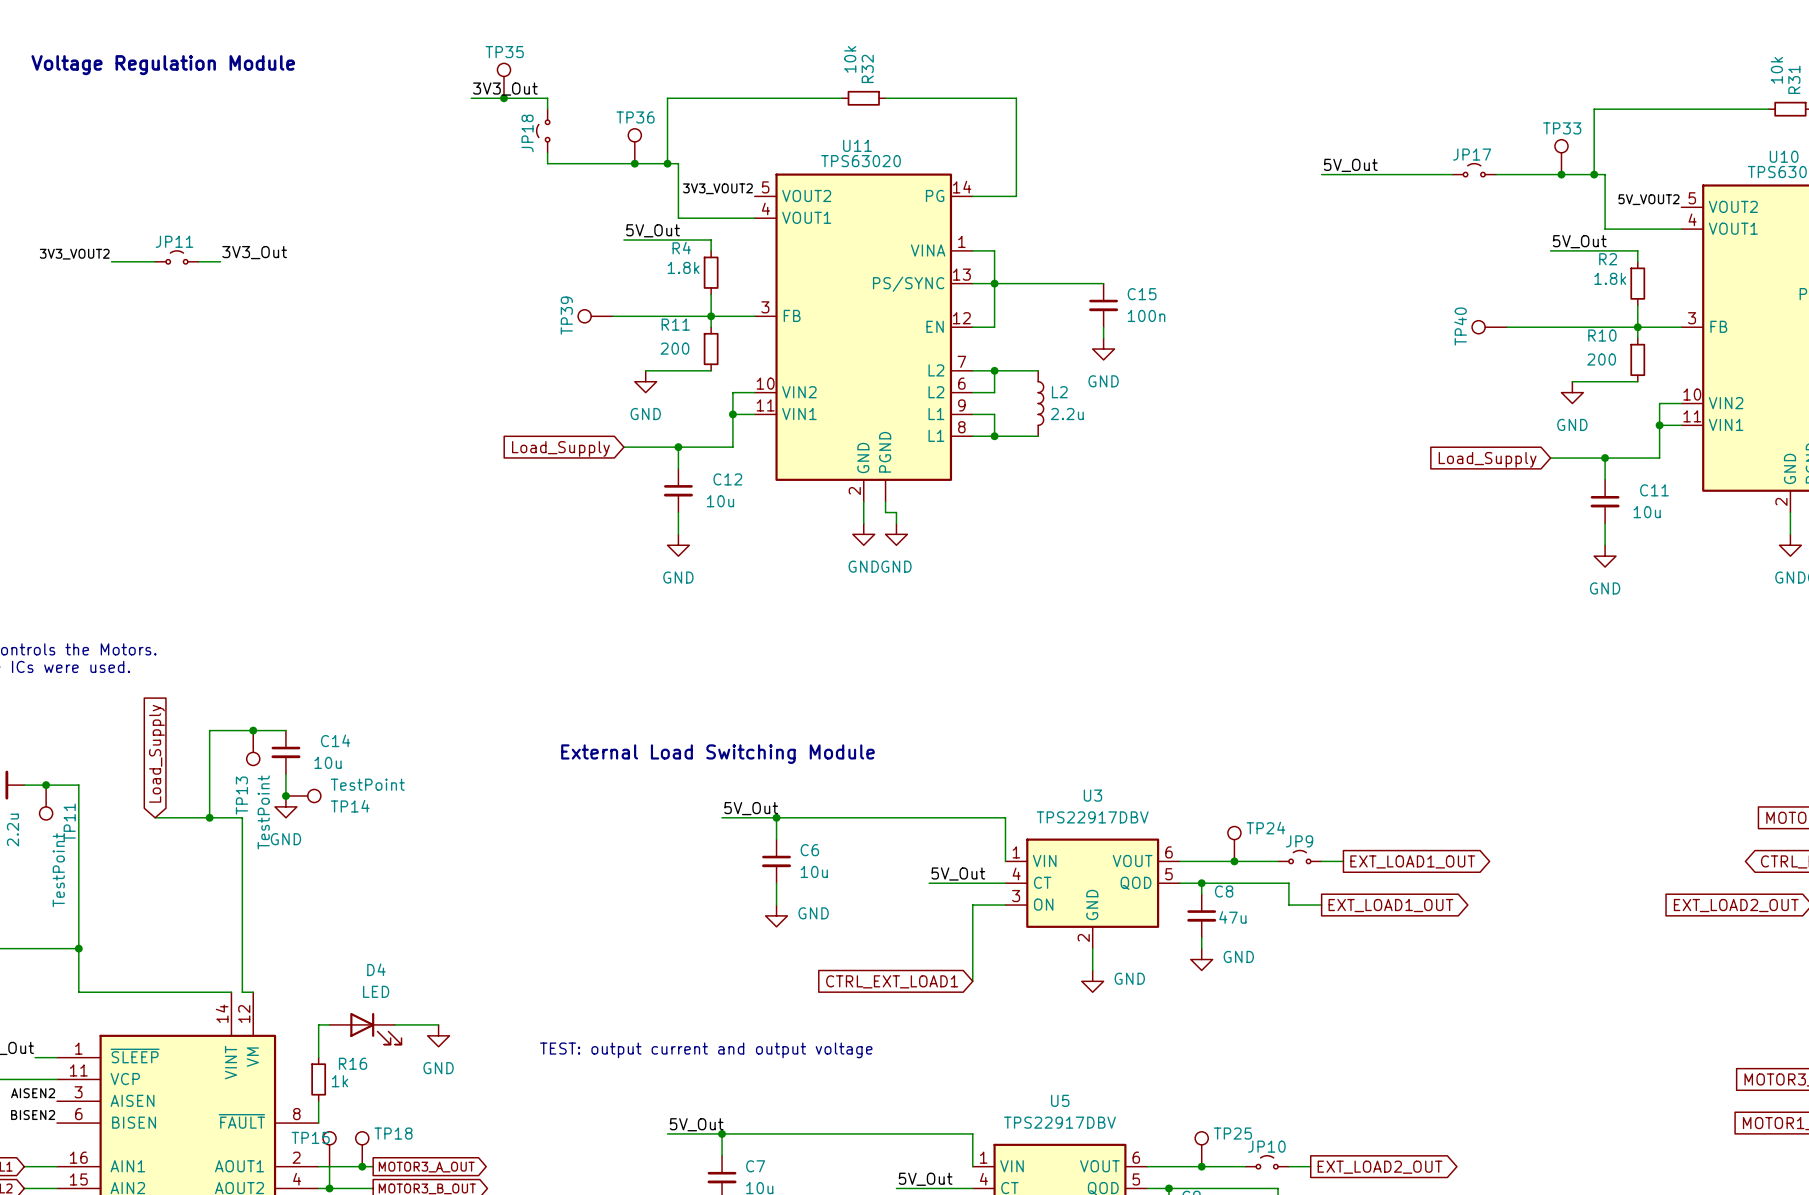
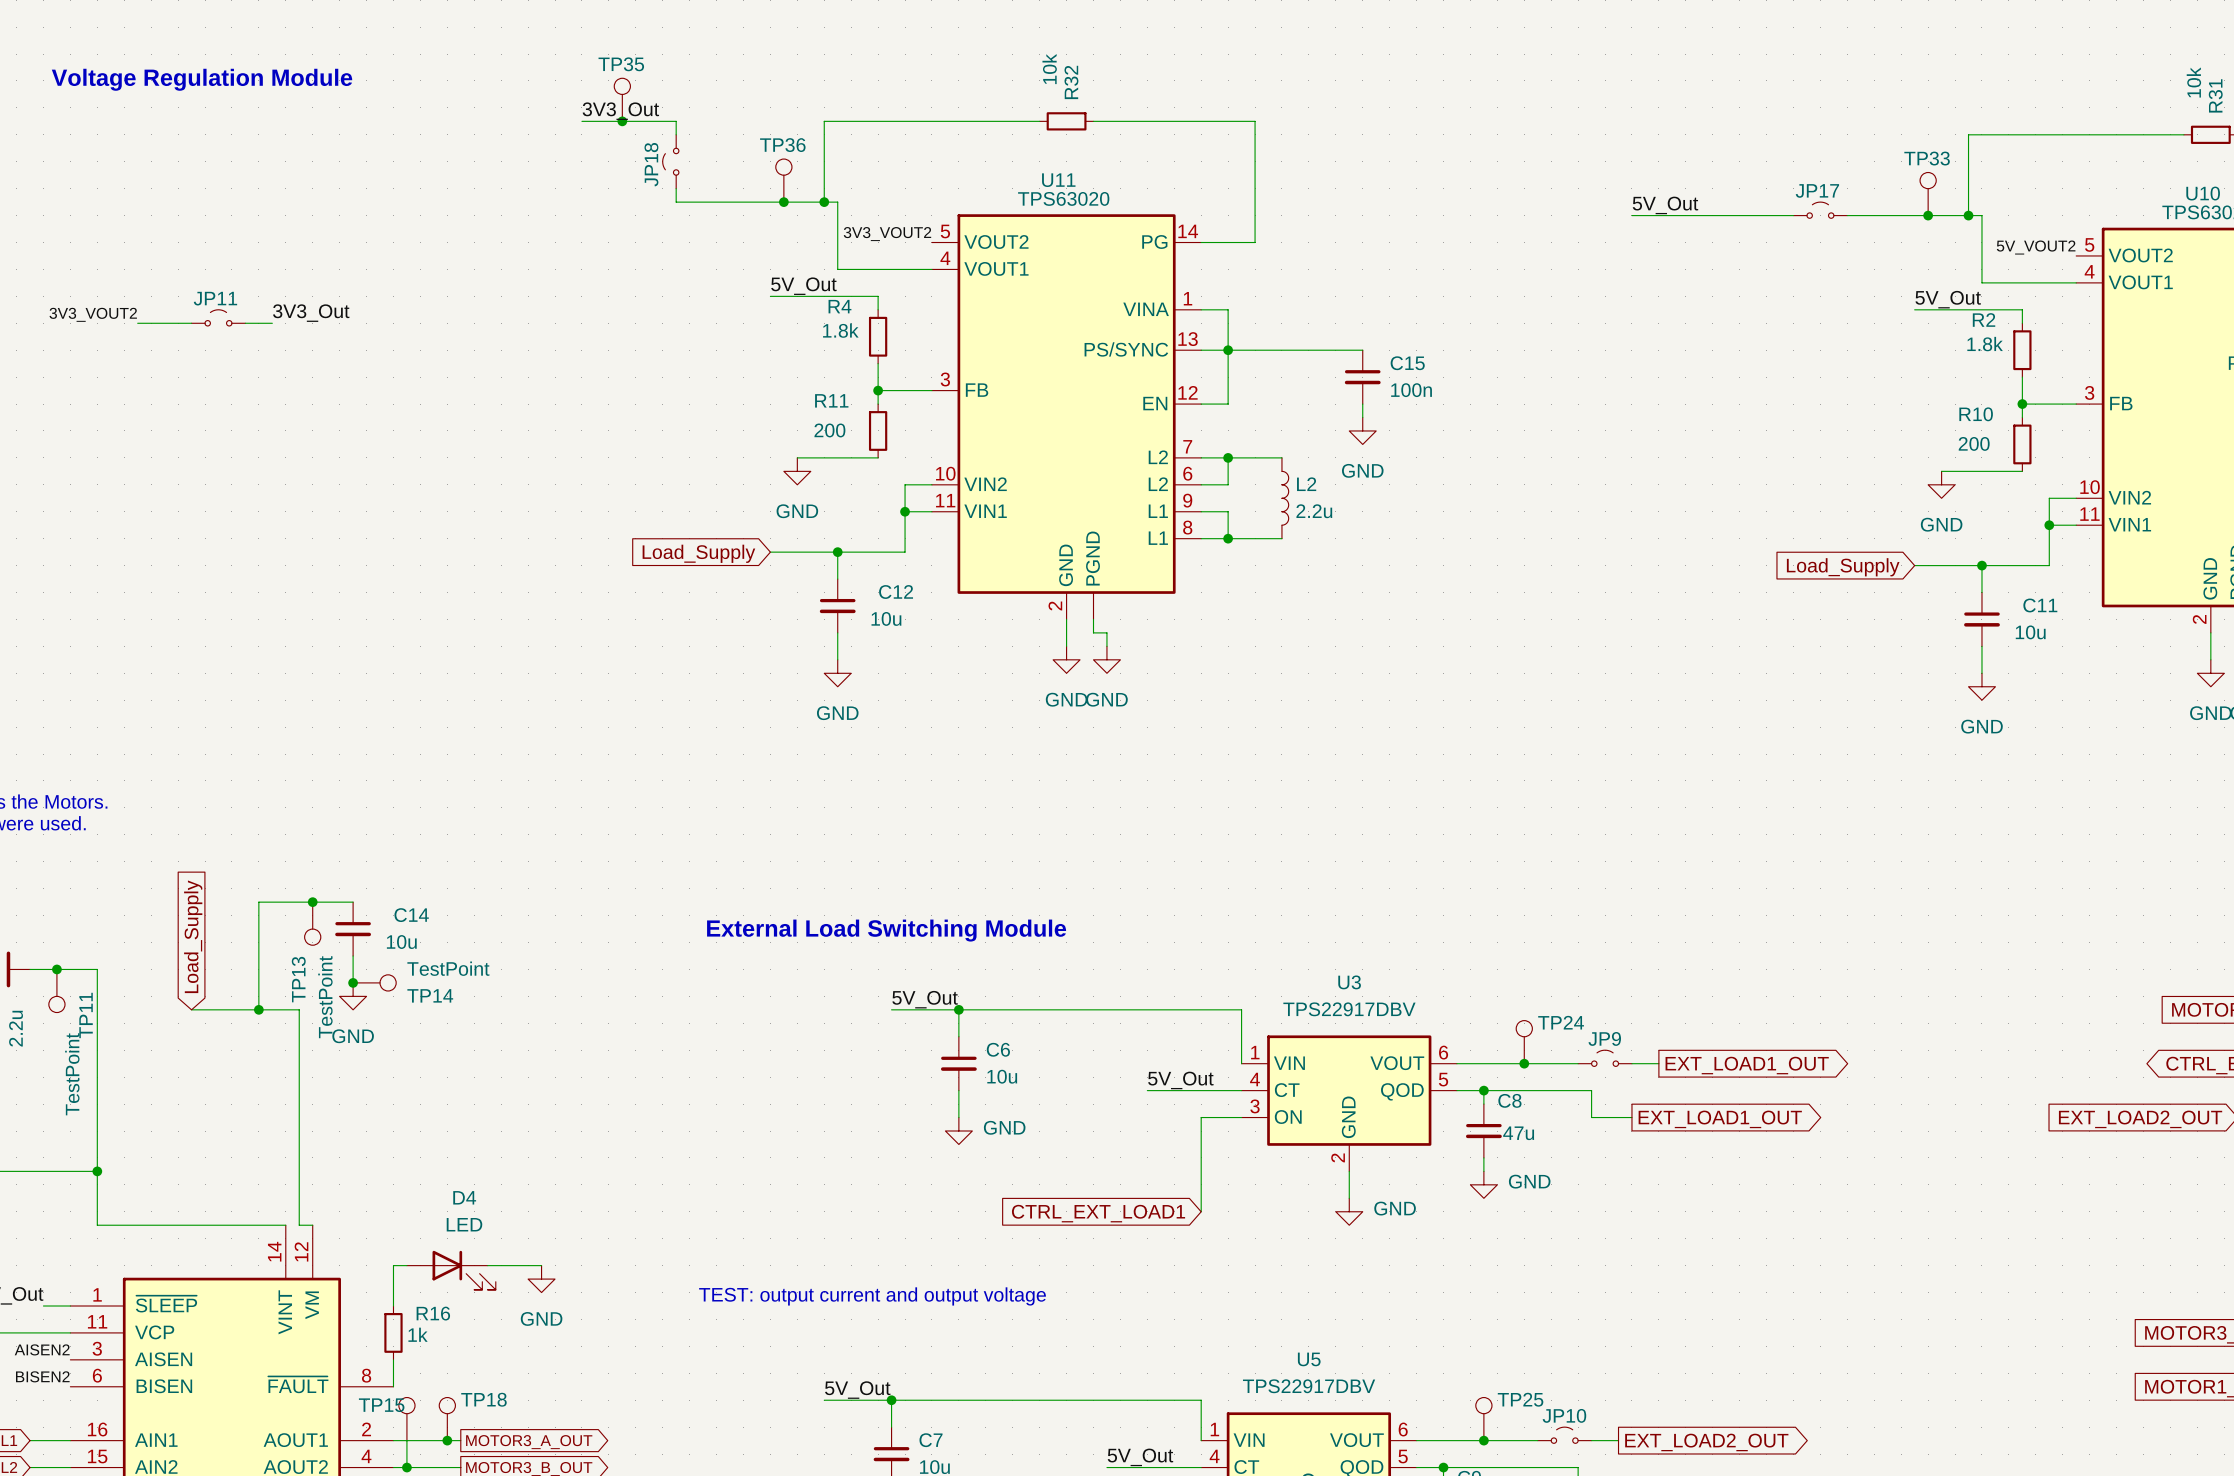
TP39: (595, 316) -> none
wire: (613, 316) (711, 316) -> none
TP40: (1489, 327) -> none
wire: (1506, 327) (1637, 327) -> none

